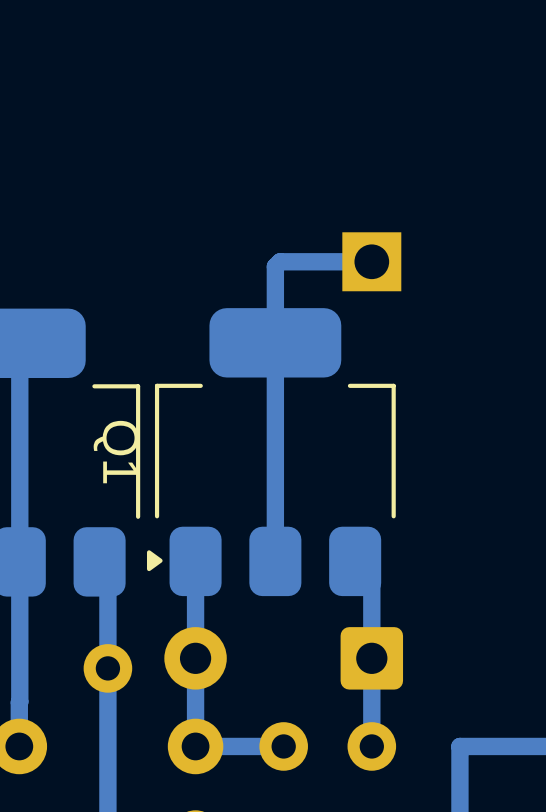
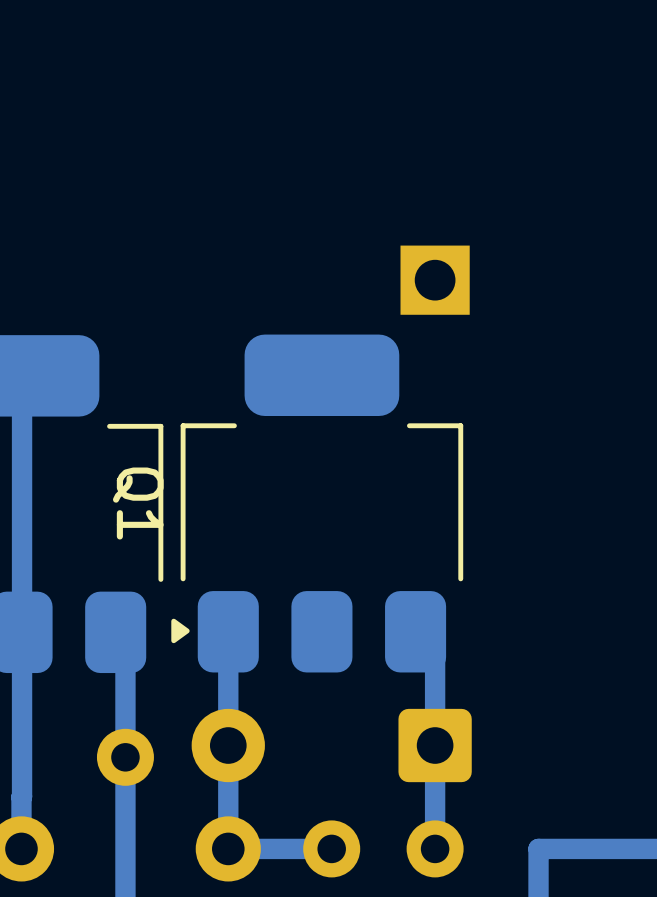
track: (371, 261) (280, 261) (275, 266) (275, 561) -> none

